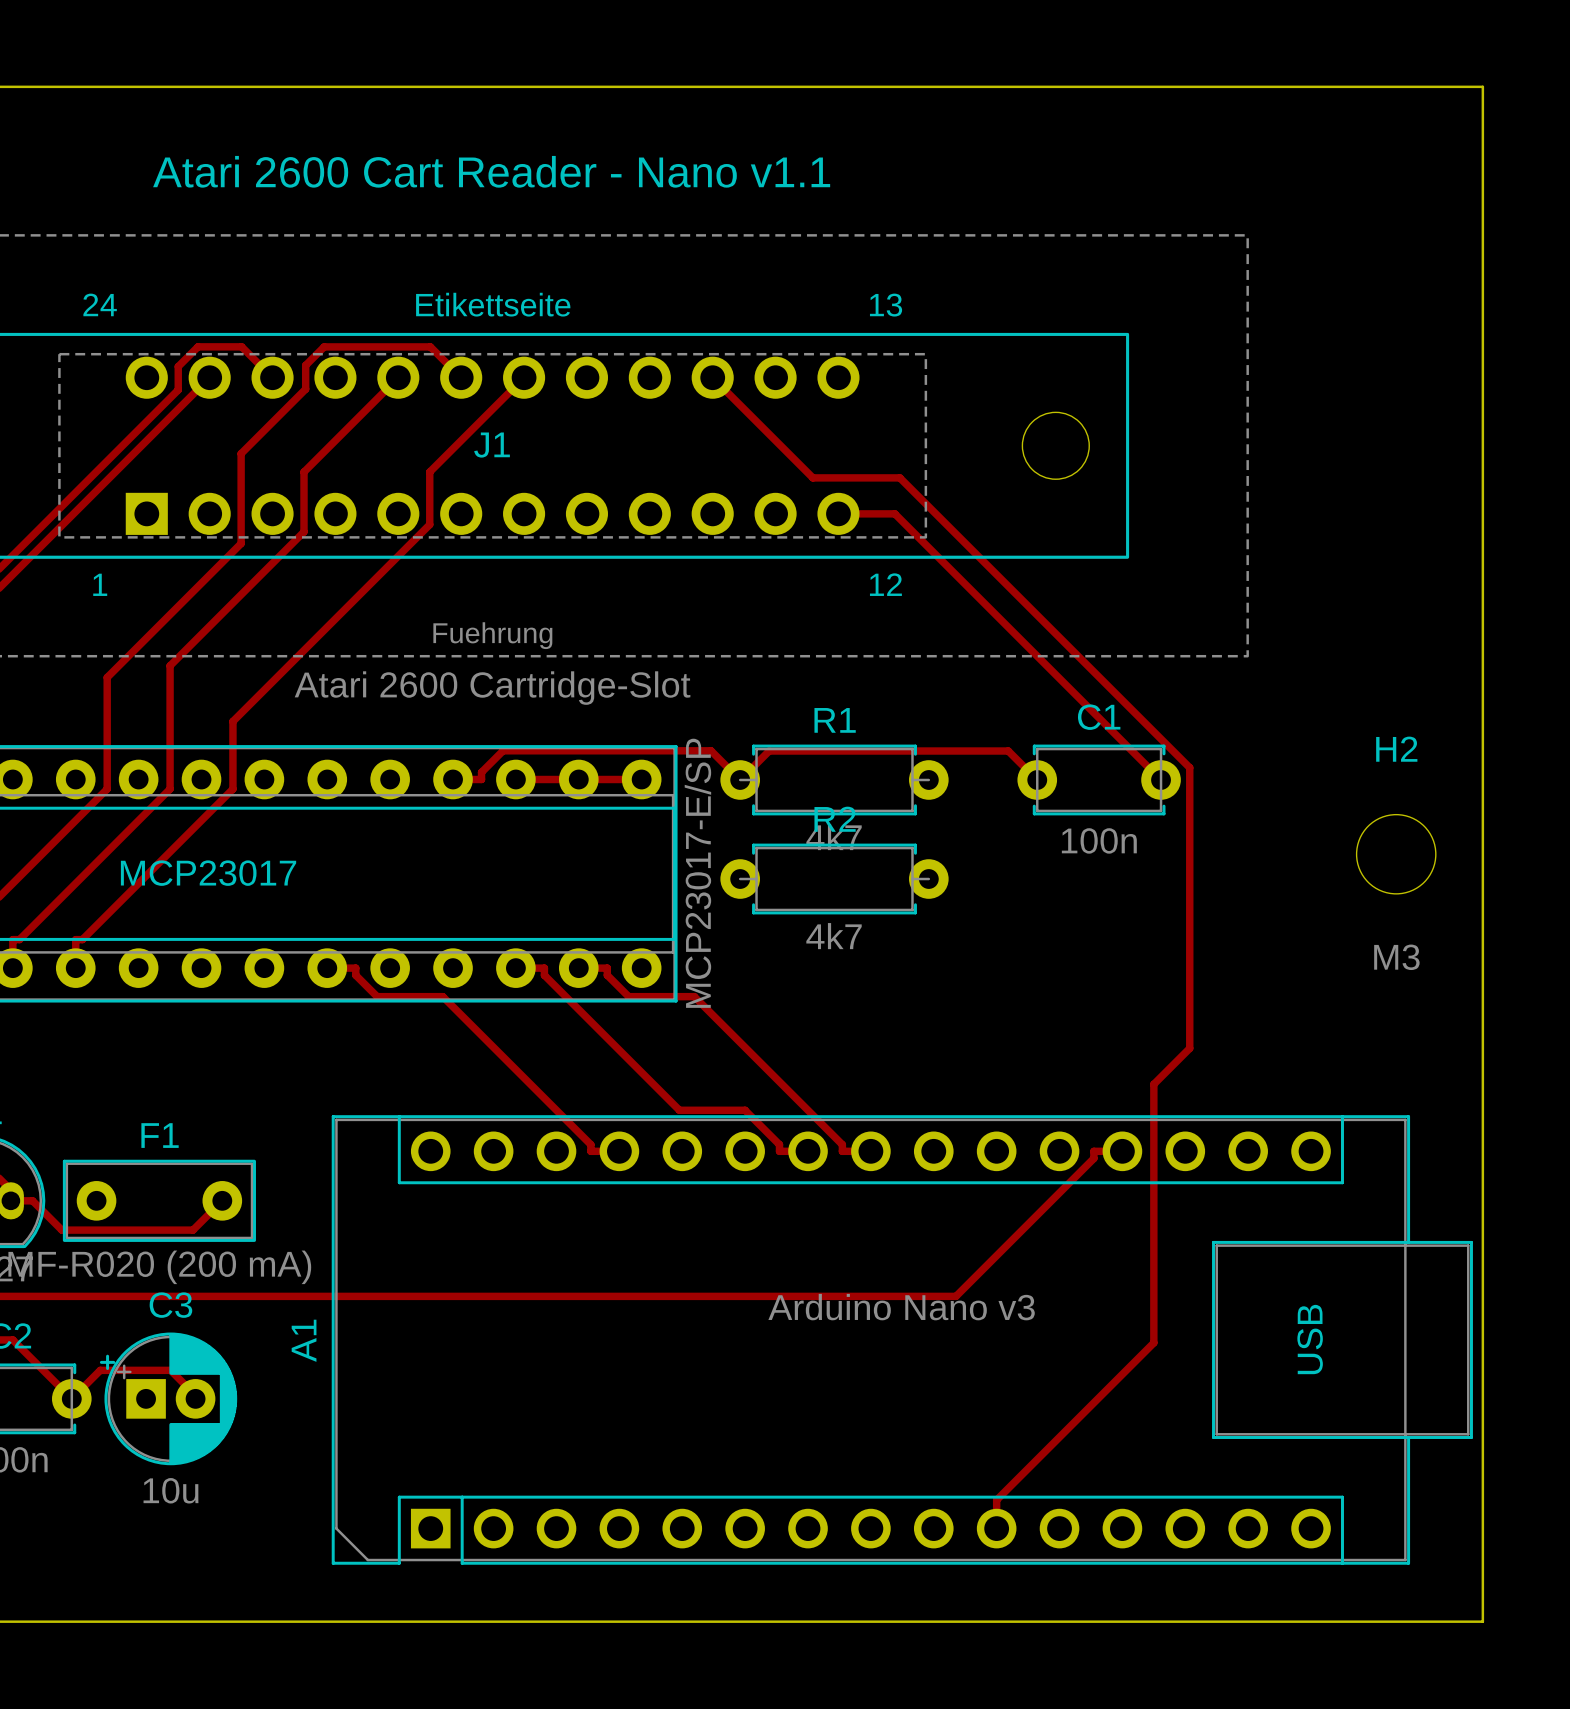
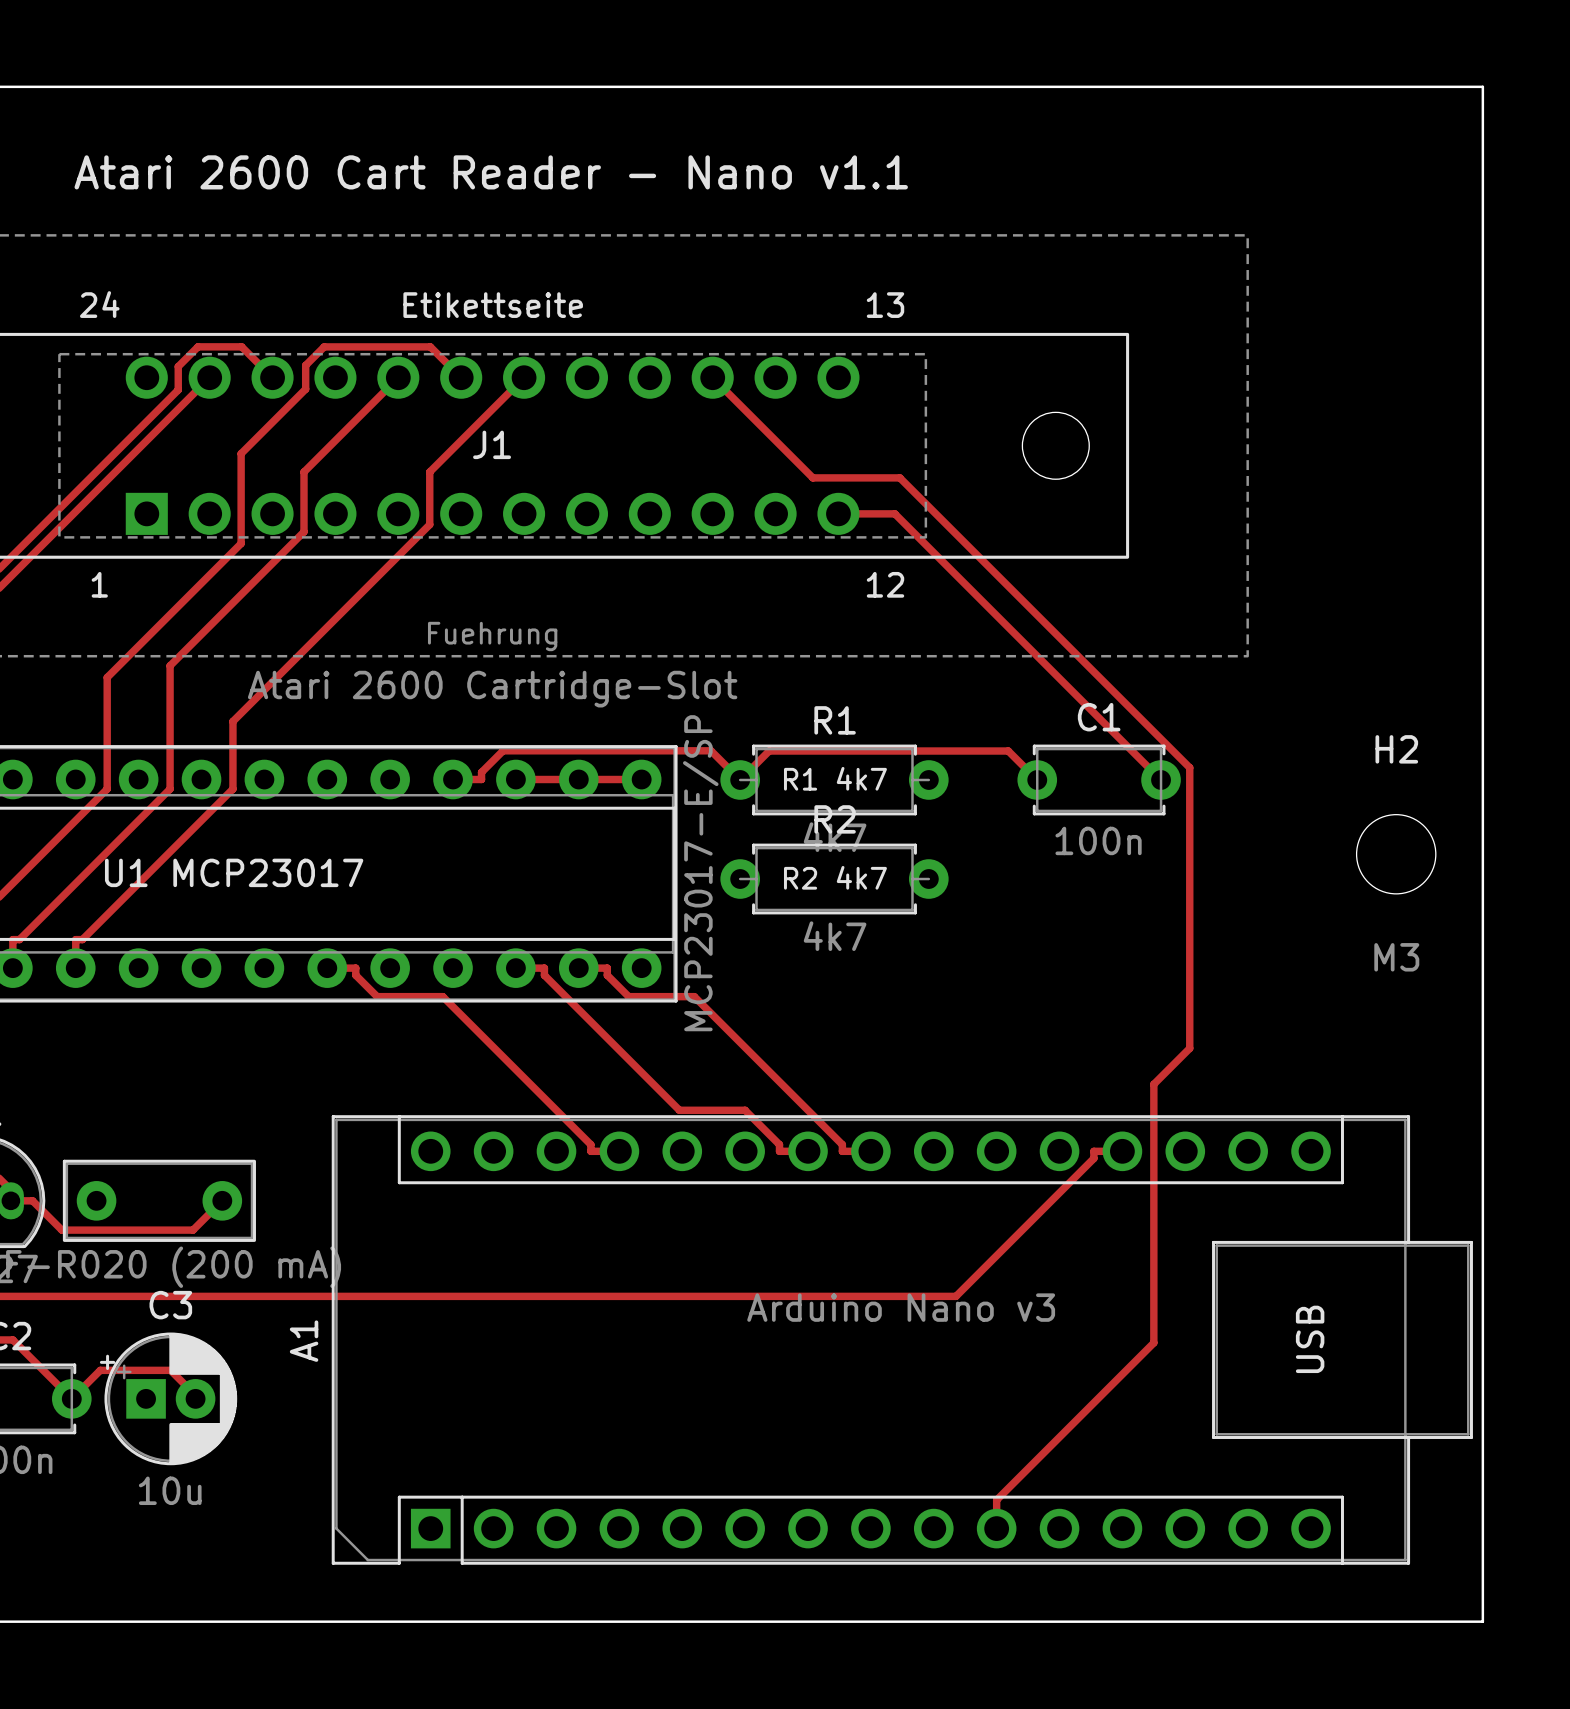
text: none -> R1 4k7 (835, 778)
text: MCP23017 (208, 873) -> U1 MCP23017 (234, 872)
text: none -> R2 4k7 (835, 877)
F1 name: F1 (160, 1135) -> none

